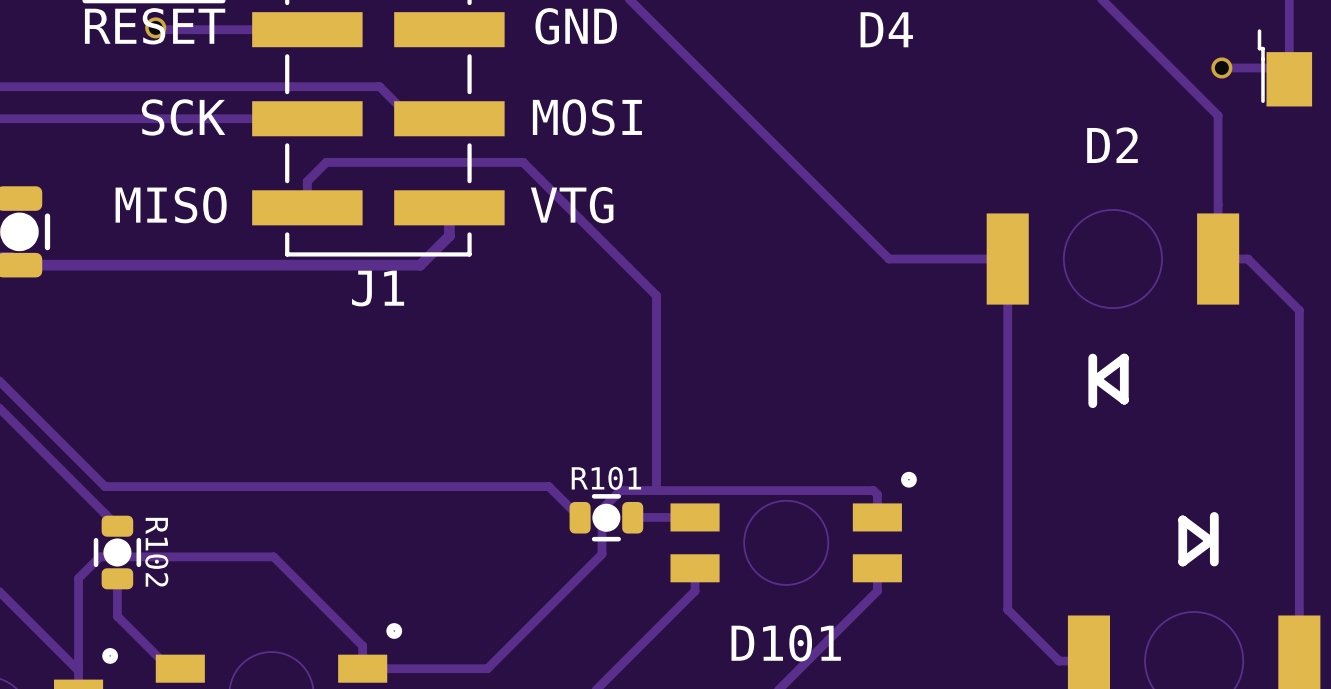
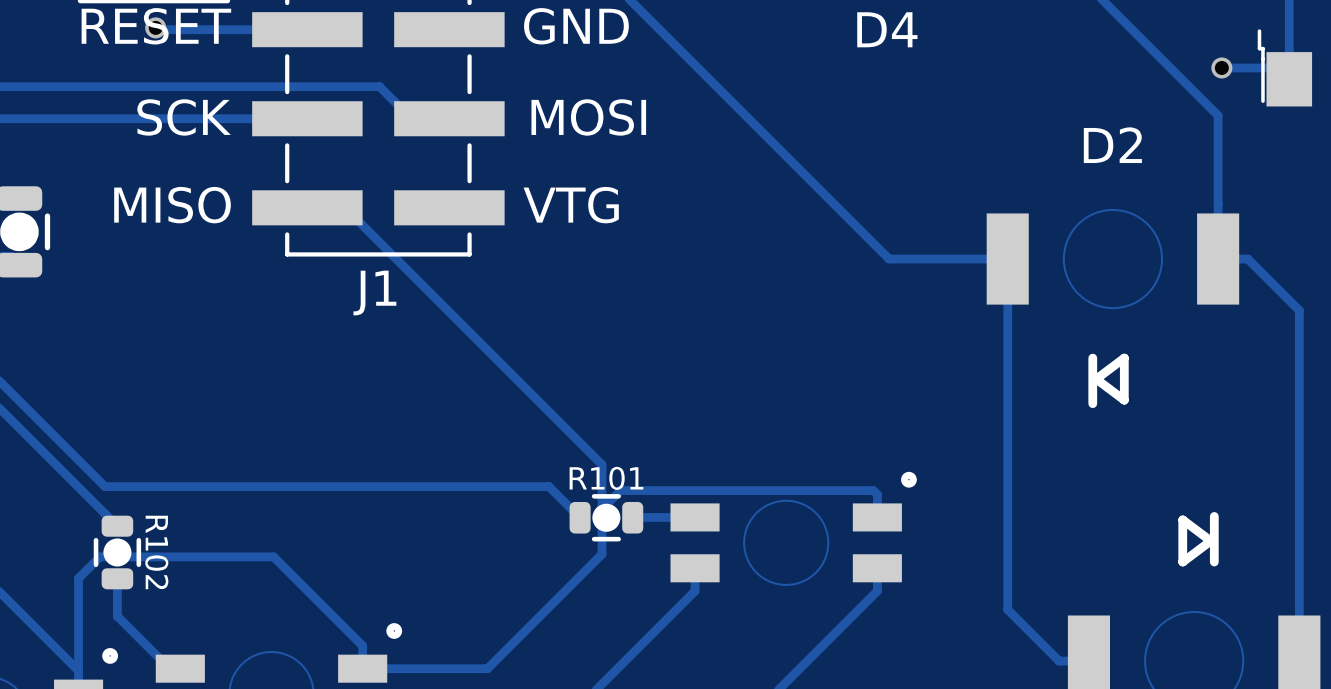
track: (307, 207) (307, 181) (326, 162) (523, 162) (656, 295) (656, 490) -> (307, 207) (345, 207) (602, 464) (602, 509)
track: (449, 207) (449, 236) (420, 265) (19, 265) -> none
D101 name: D101 (786, 643) -> none

